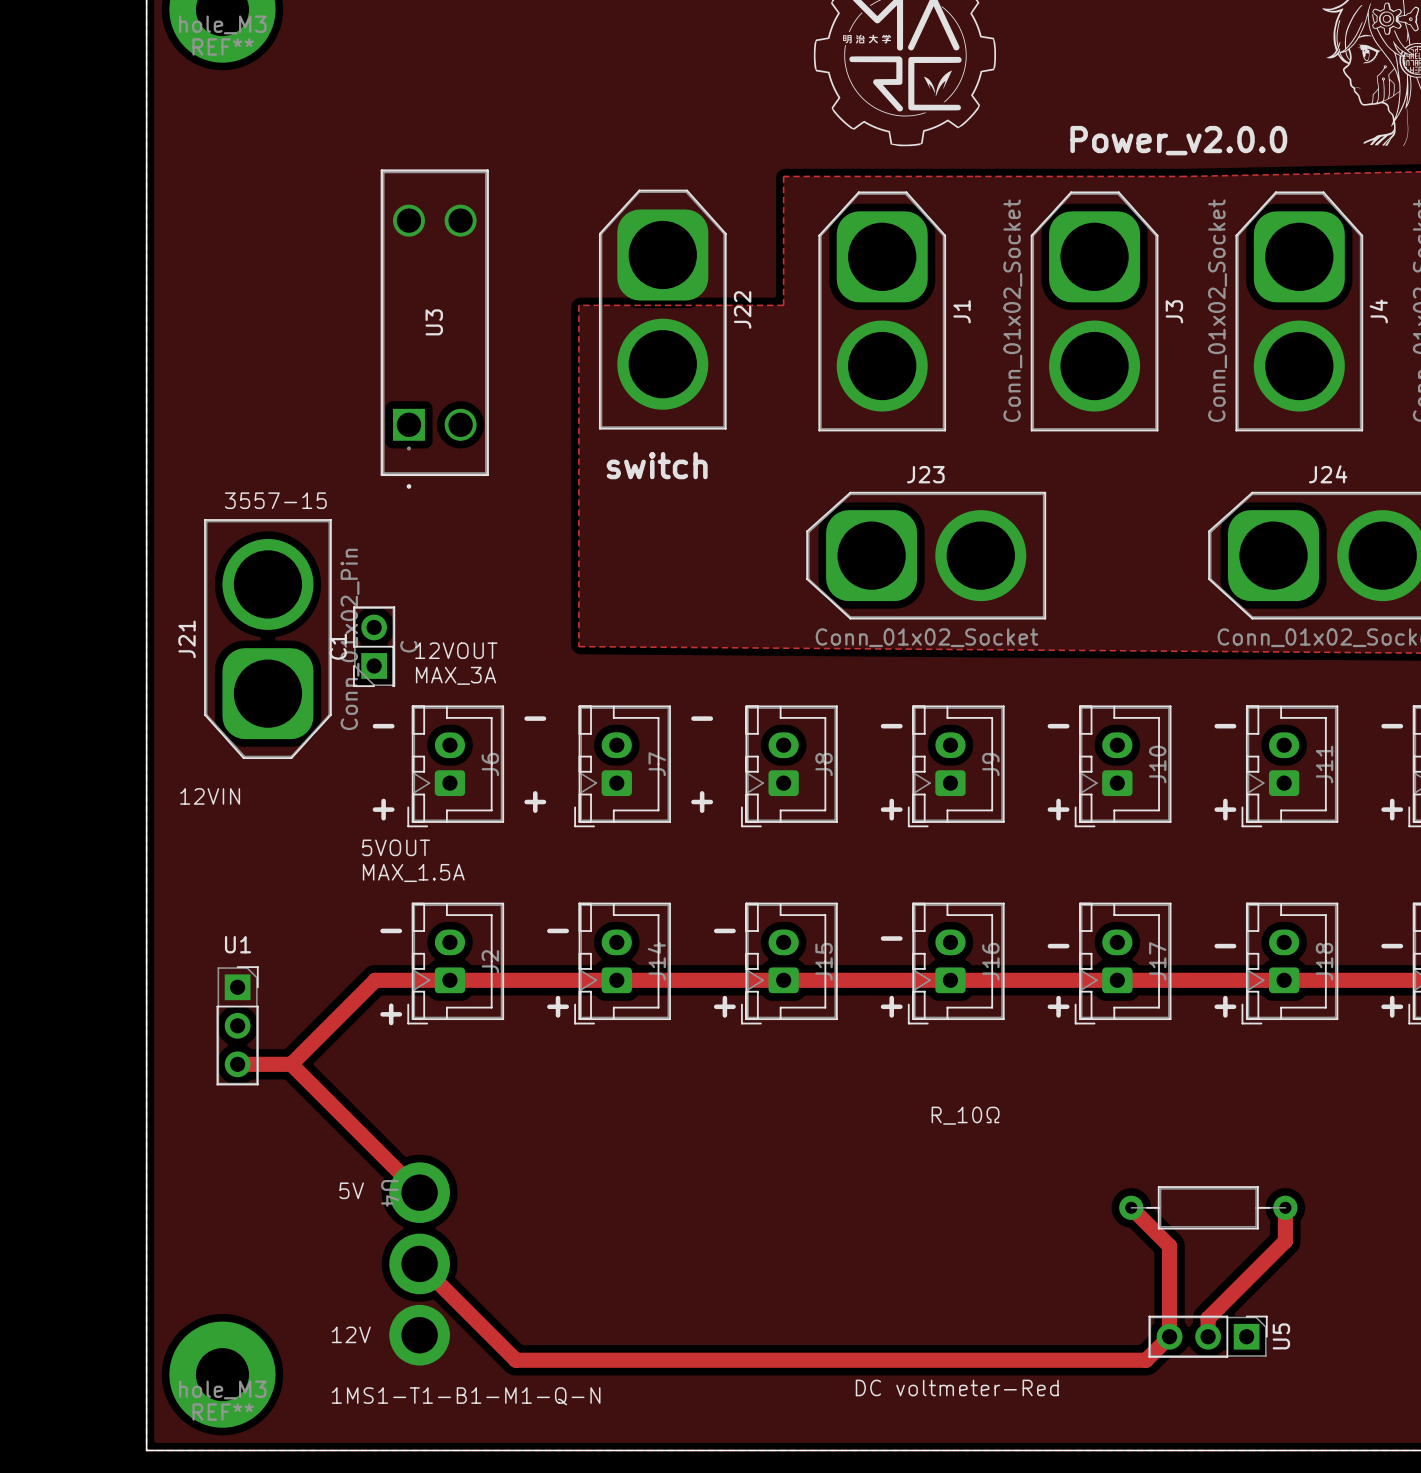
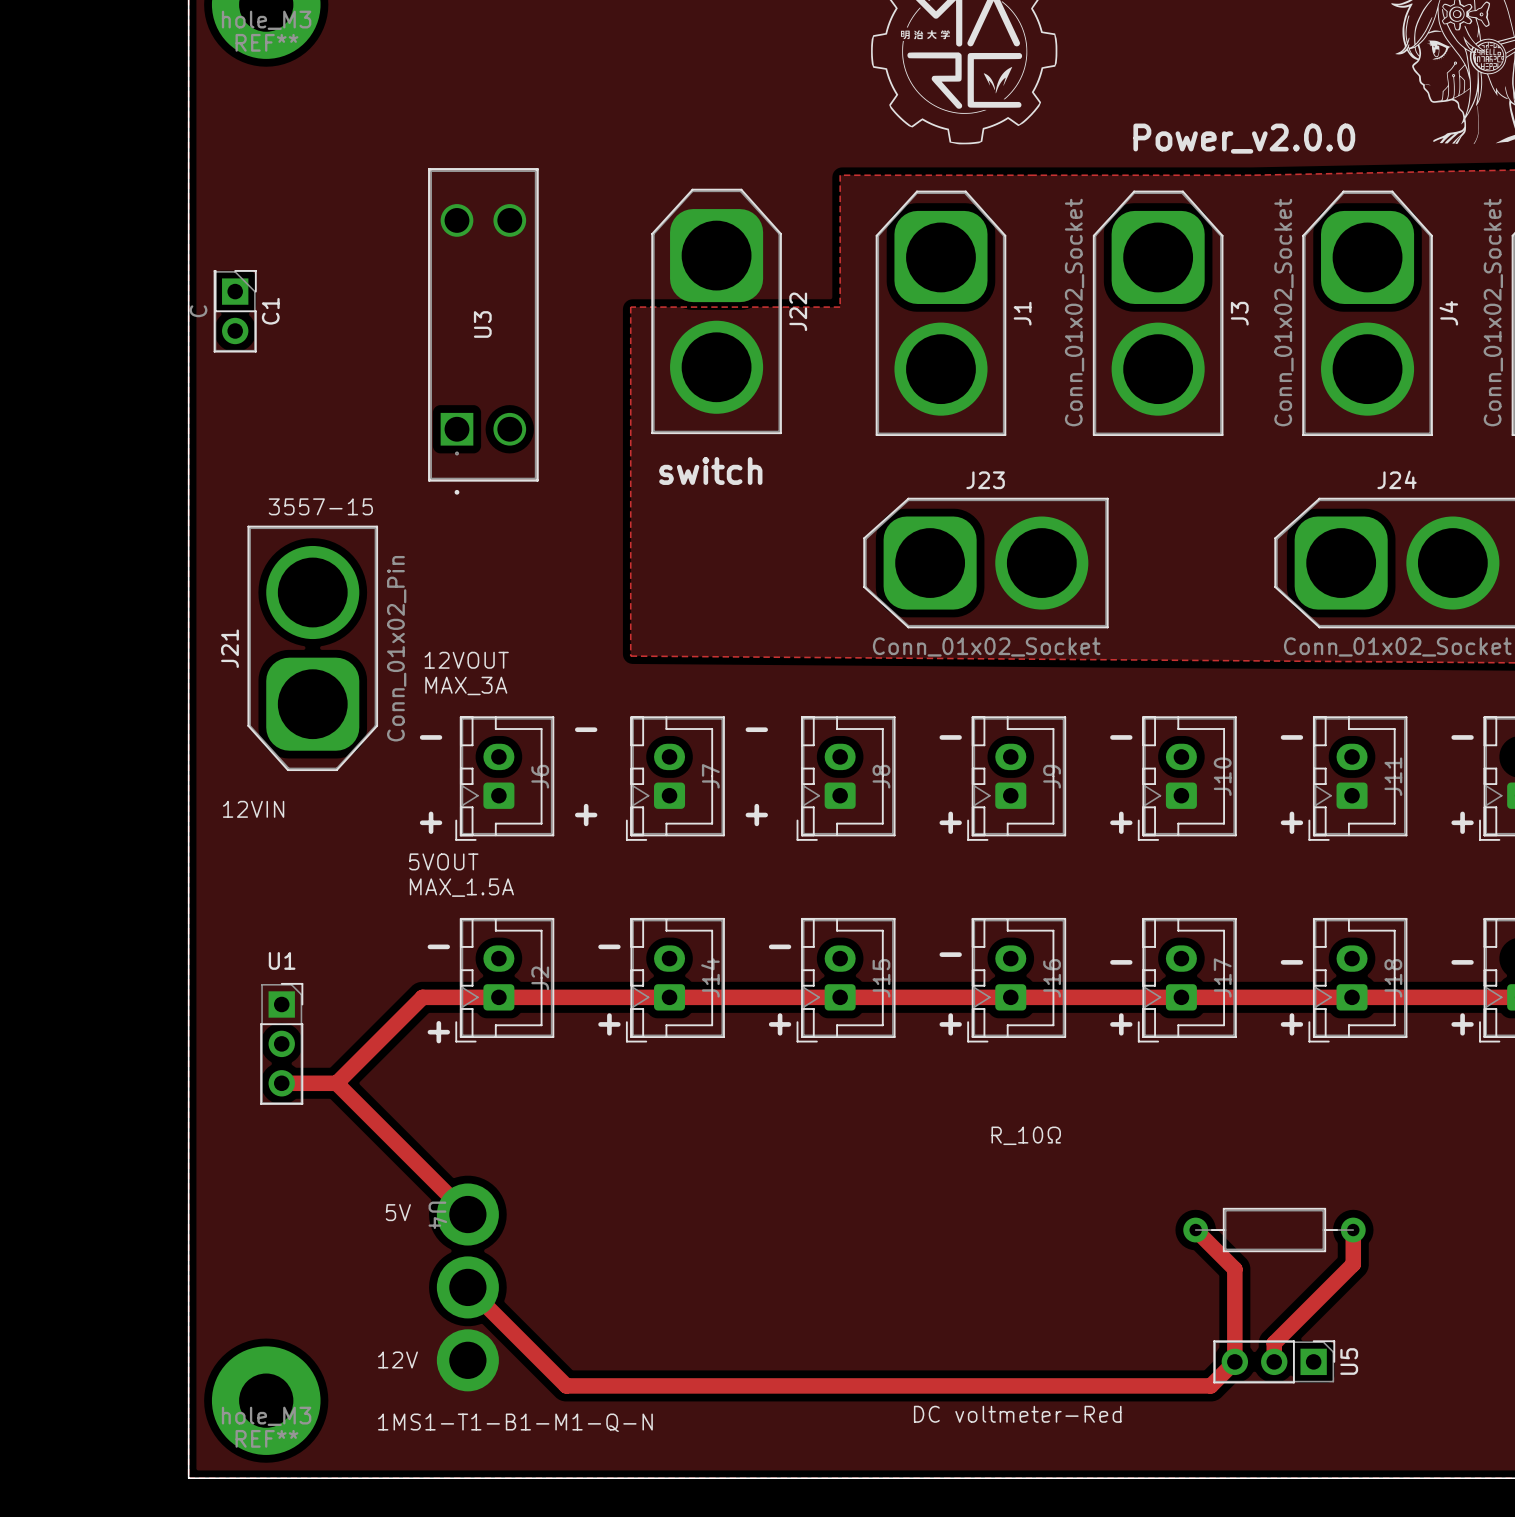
C1 rotation: 0° (374, 646) -> 180° (235, 311)
C1 position: (374, 646) -> (235, 311)
text position: 12VOUT (456, 650) -> 12VOUT (466, 660)
text position: MAX_3A (456, 675) -> MAX_3A (466, 685)

